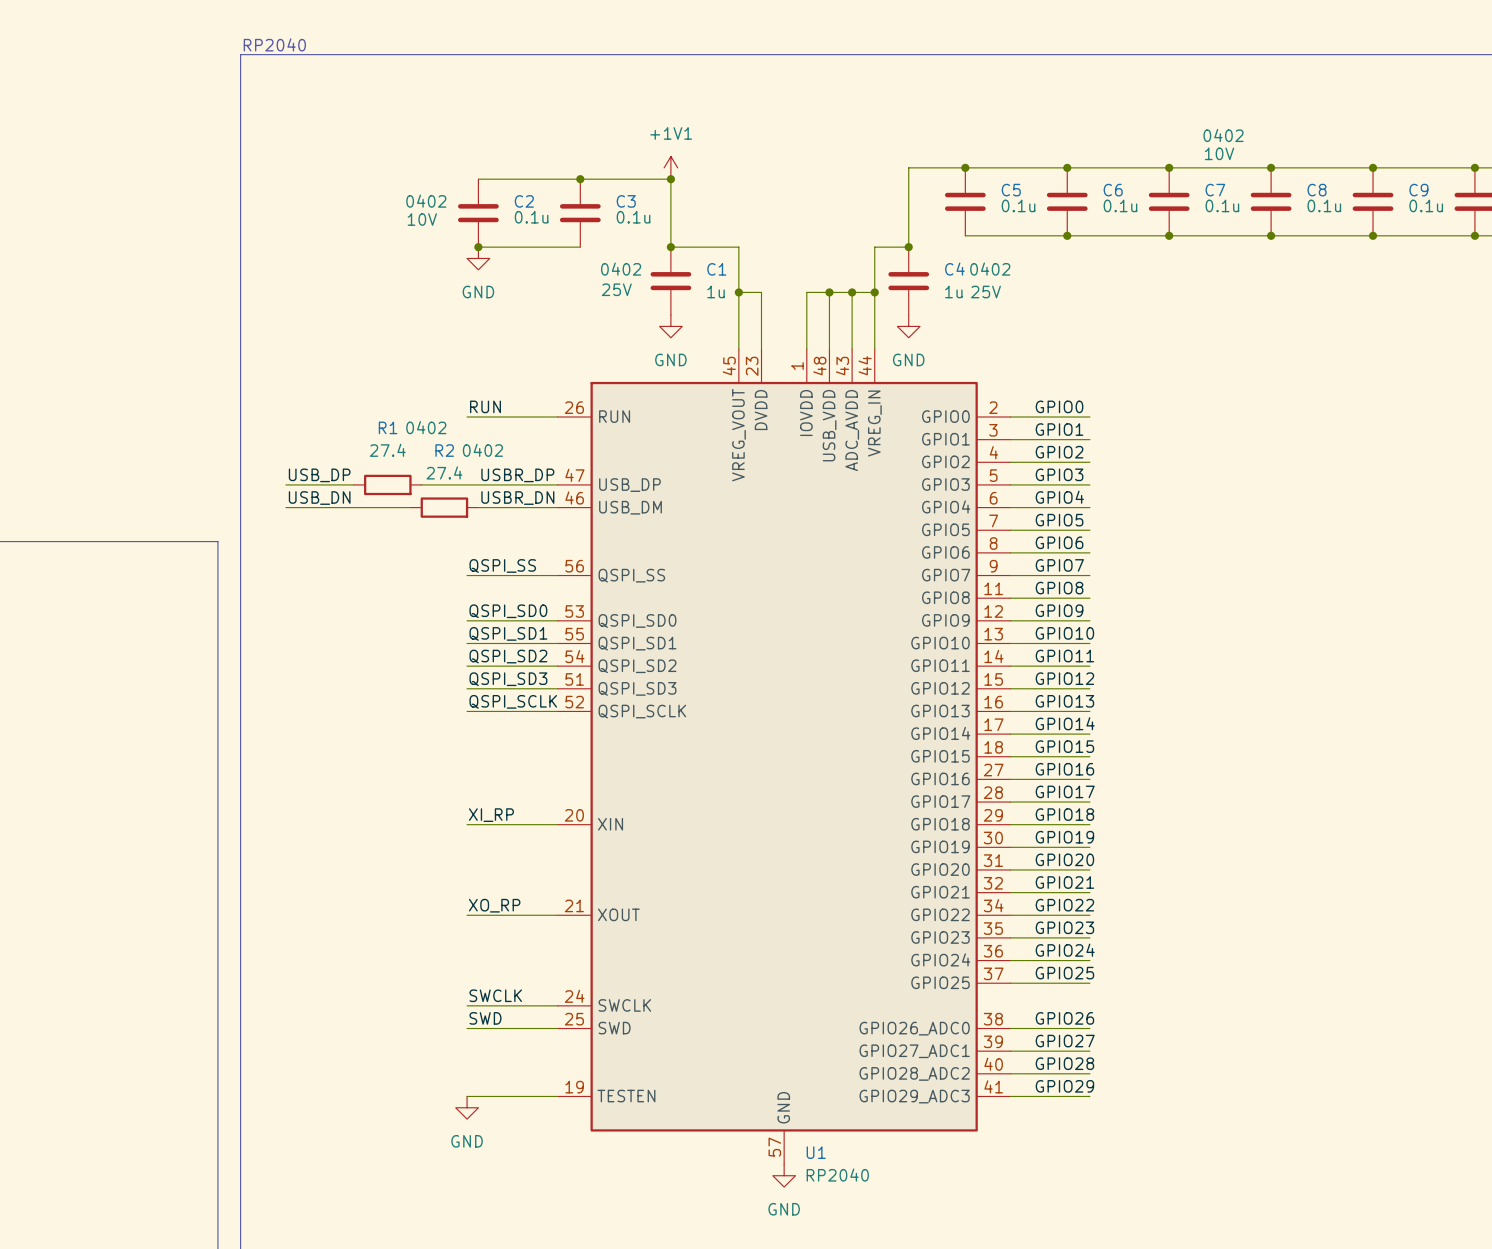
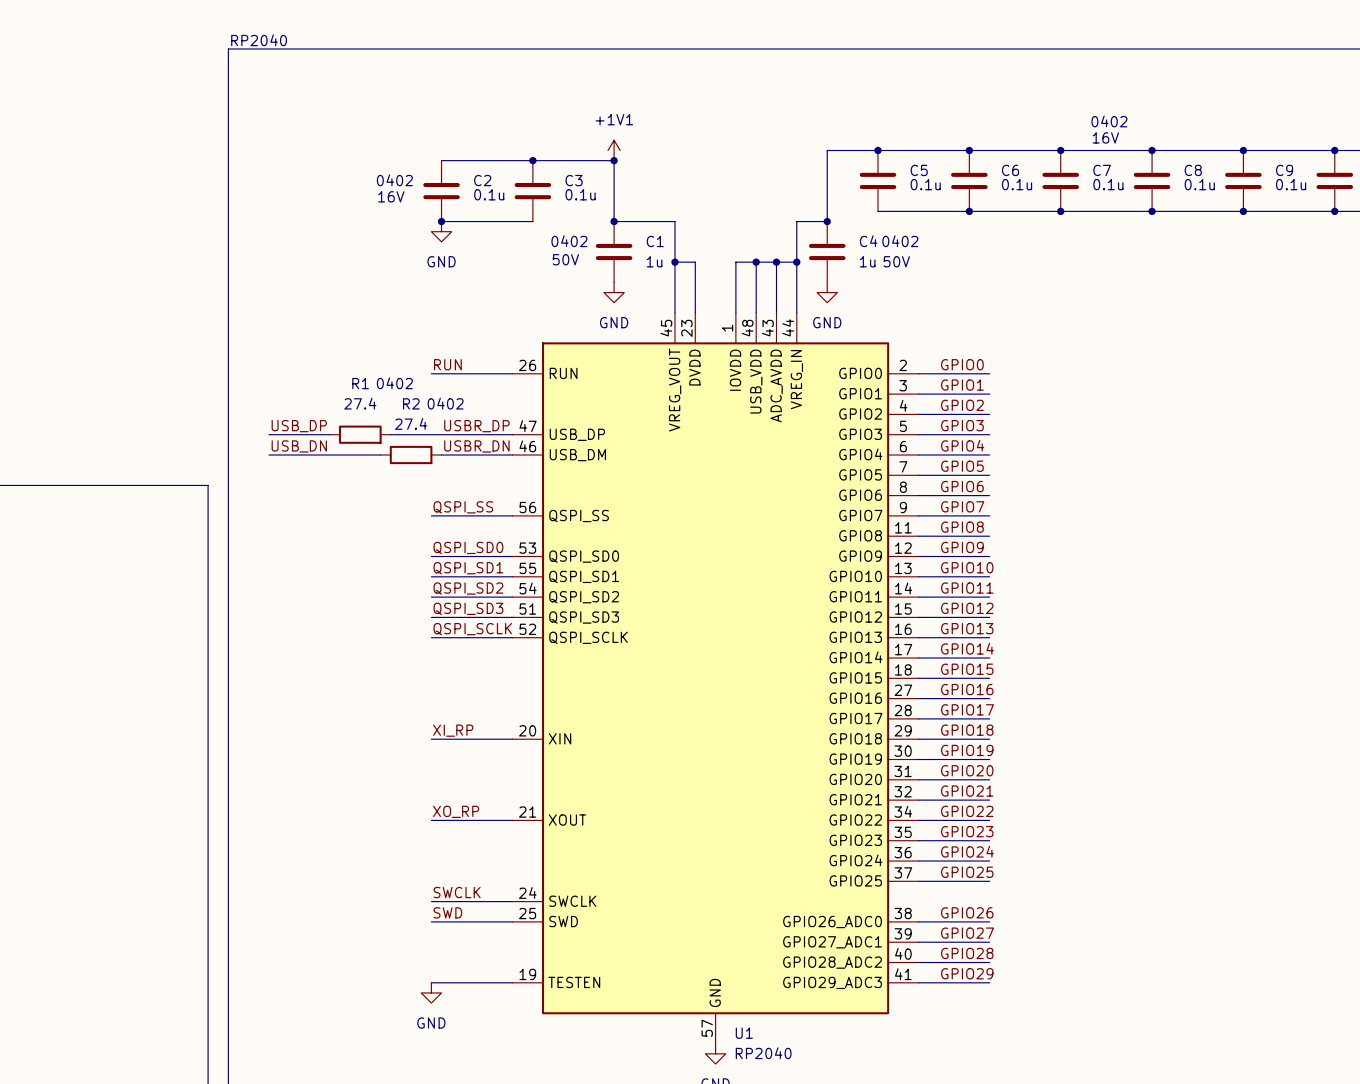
part text: 10V (1219, 153) -> 16V (1105, 137)
C2 text: 10V (422, 219) -> 16V (391, 196)
C1 text: 25V (616, 289) -> 50V (565, 259)
C4 text: 25V (985, 292) -> 50V (896, 261)

